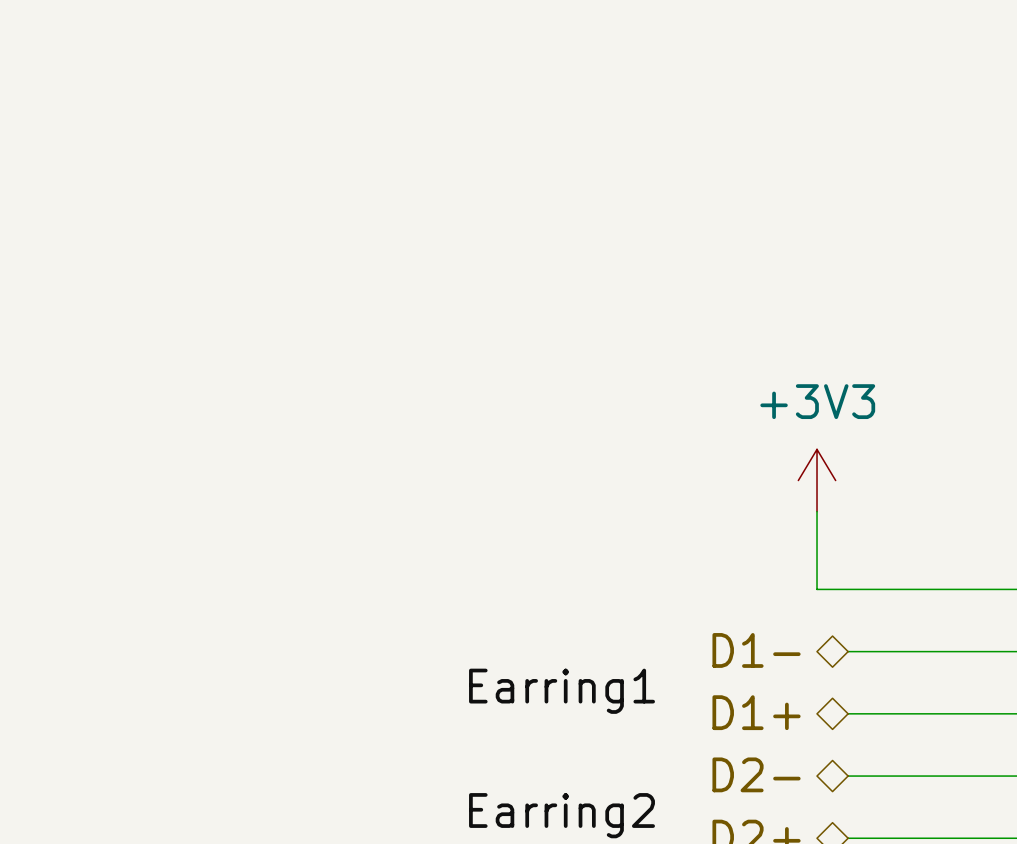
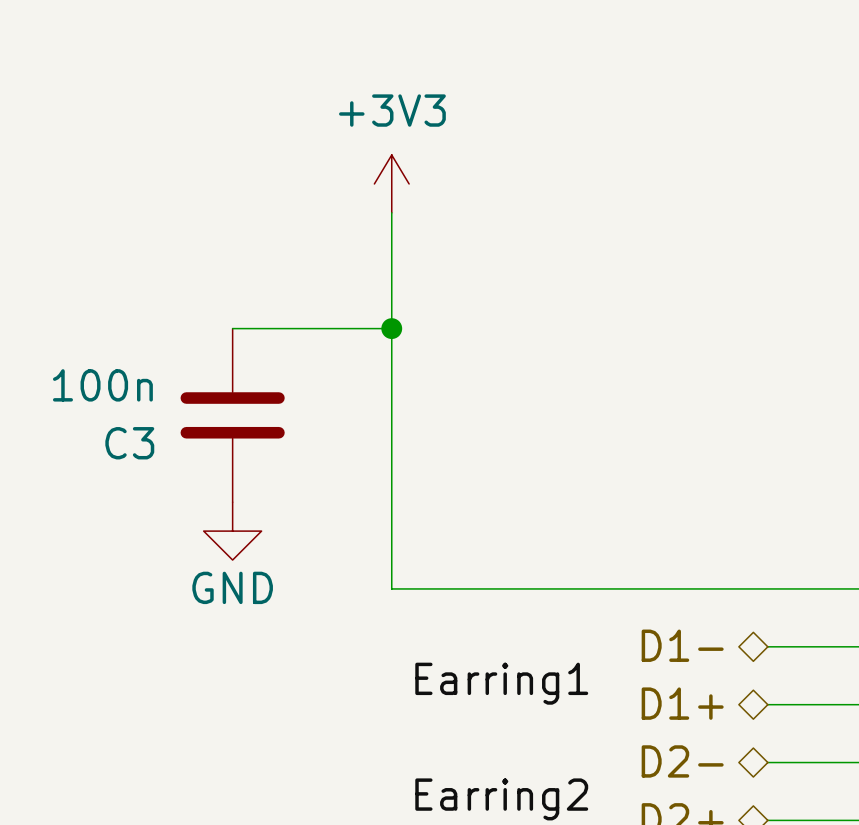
power symbol: none -> +3V3 (391, 183)
wire: none -> (232, 328) (391, 328)
junction: none -> (391, 328)
C3: none -> 100n (232, 415)
power symbol: +3V3 (817, 480) -> none
wire: (817, 511) (817, 589) -> (391, 212) (391, 588) (738, 588)
power symbol: none -> GND (232, 531)

